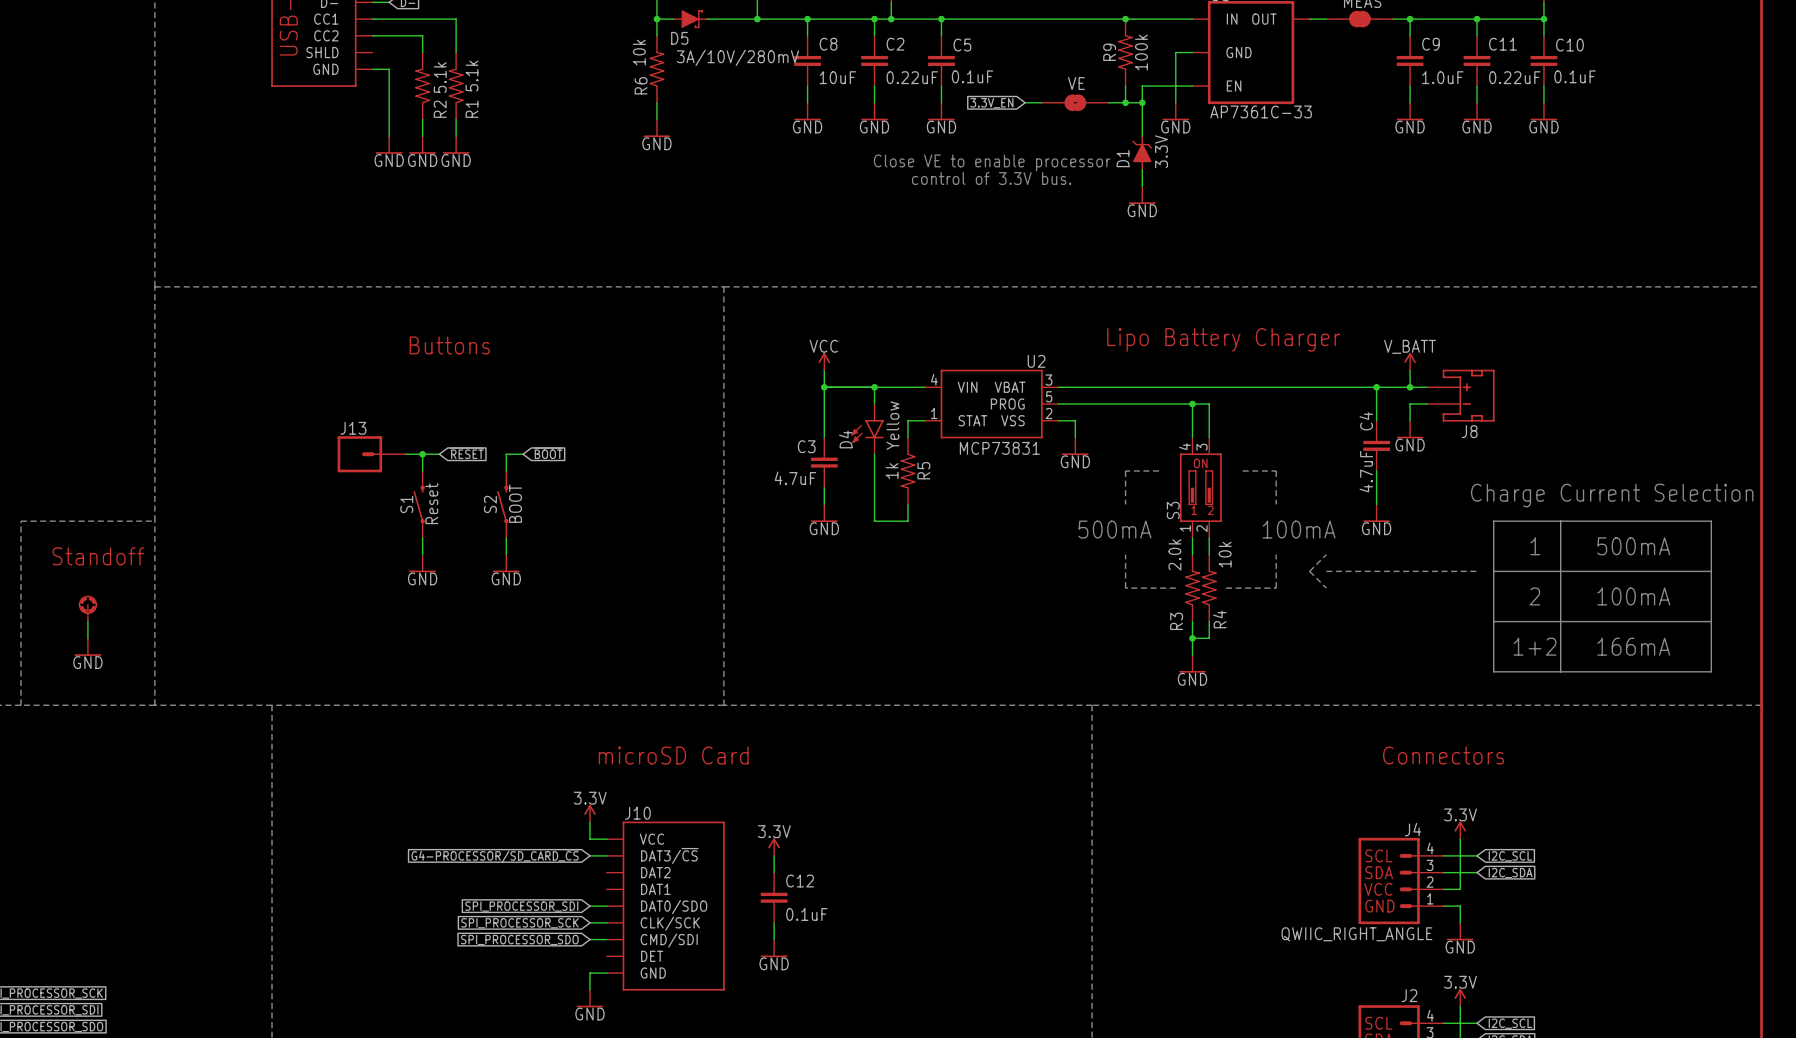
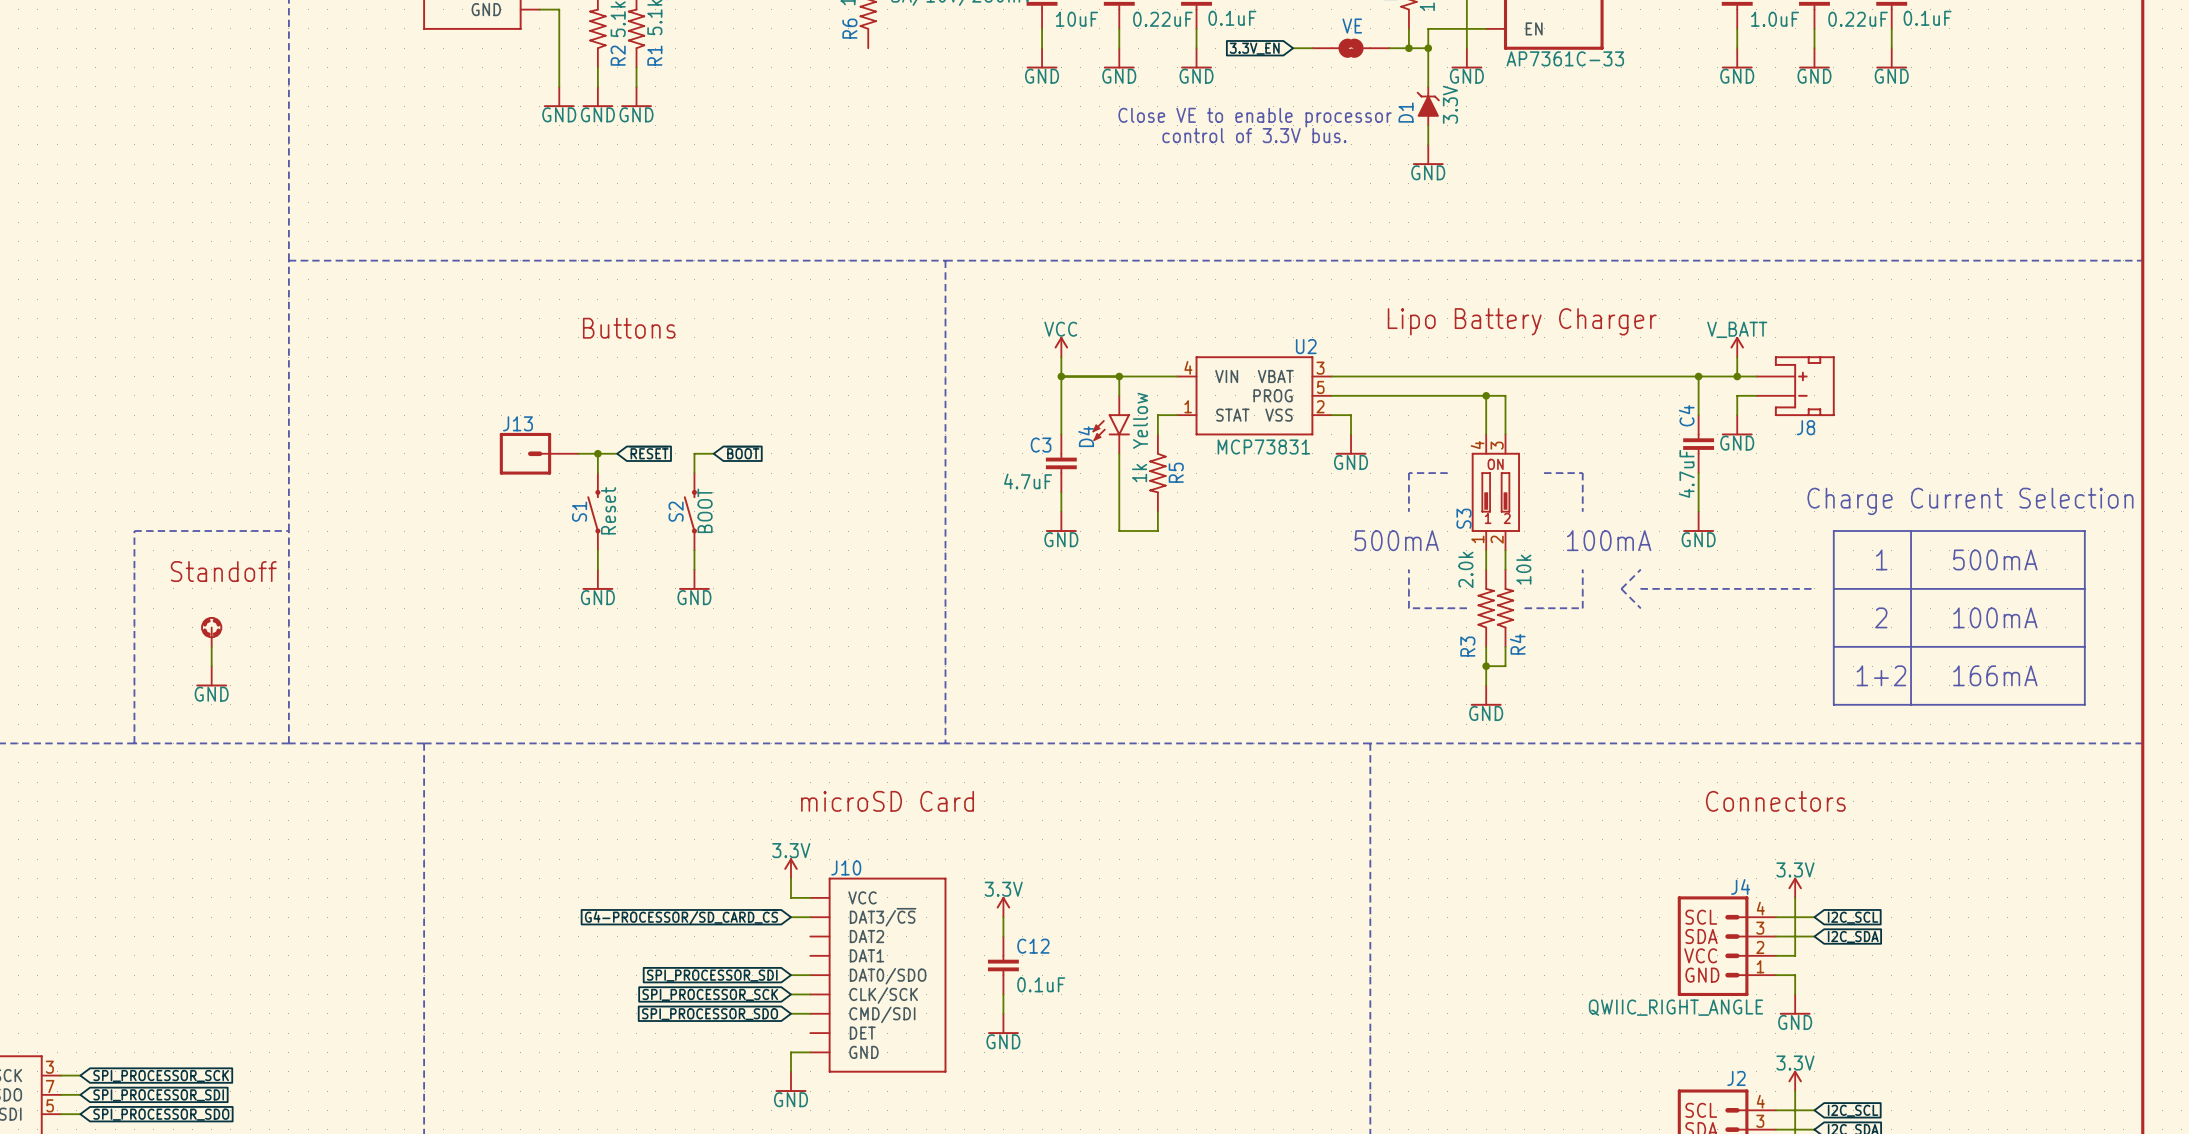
wire: (656, 102) (656, 119) -> none
power symbol: GND (656, 128) -> none

